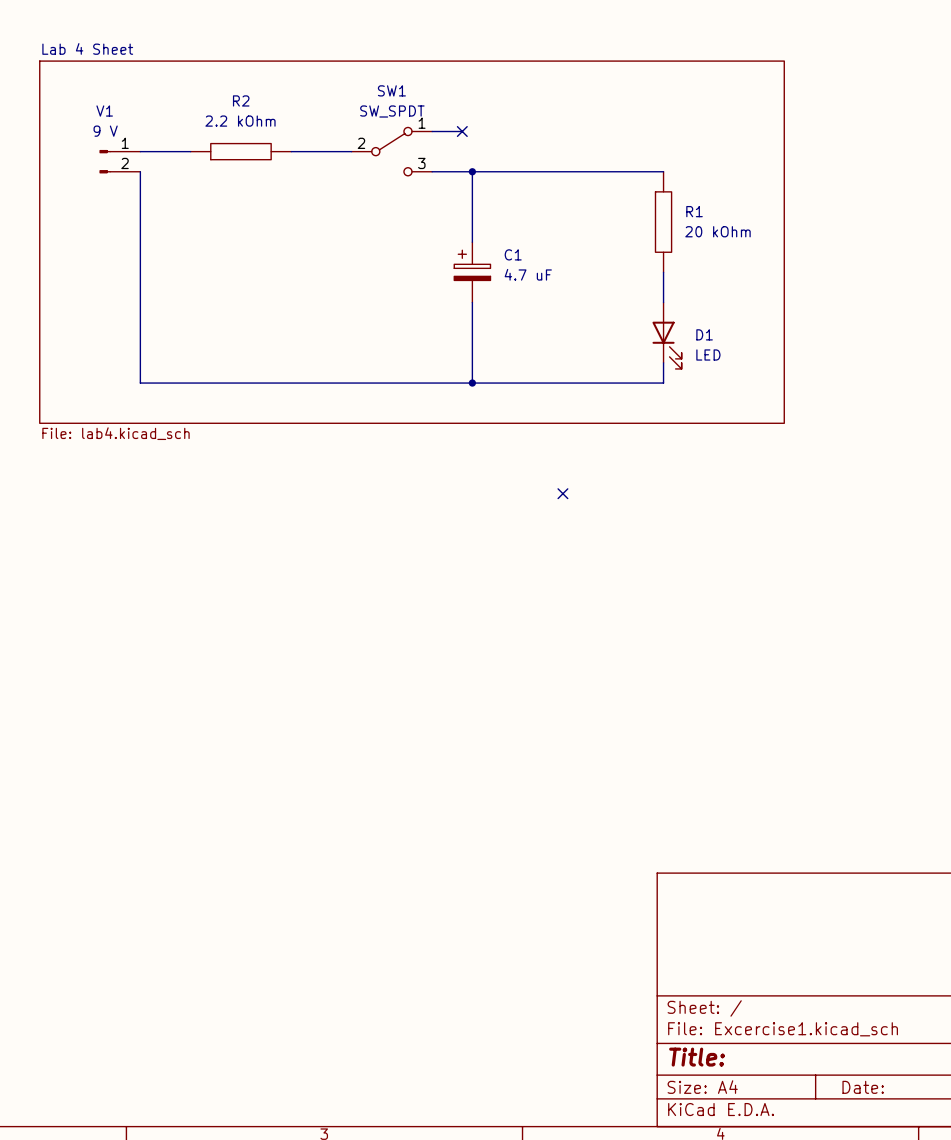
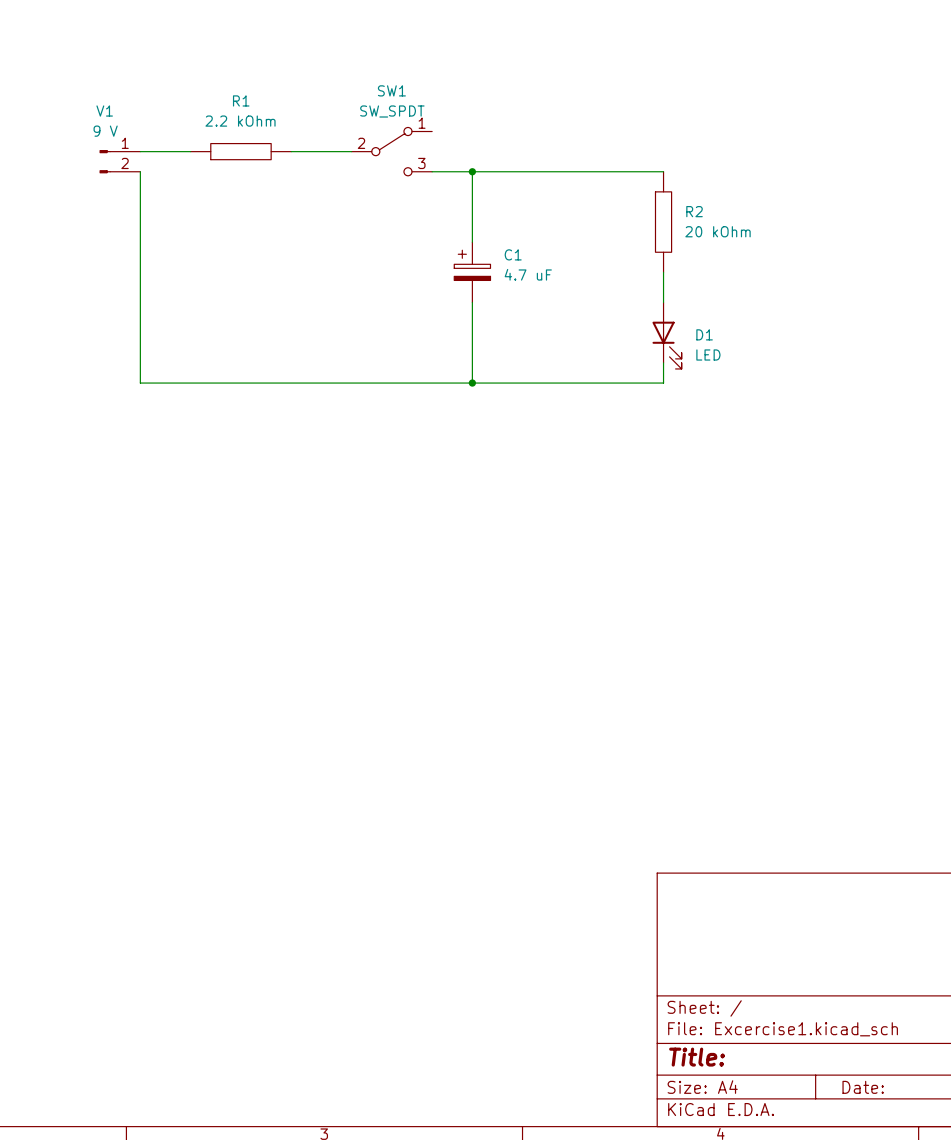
R2 name: R2 (241, 100) -> R1 (241, 100)
wire: (432, 131) (462, 131) -> none
no-connect mark: (462, 131) -> none
R1 name: R1 (694, 211) -> R2 (694, 211)
sheet Lab 4 Sheet: File: lab4.kicad_sch (412, 242) -> none
no-connect mark: (562, 493) -> none

